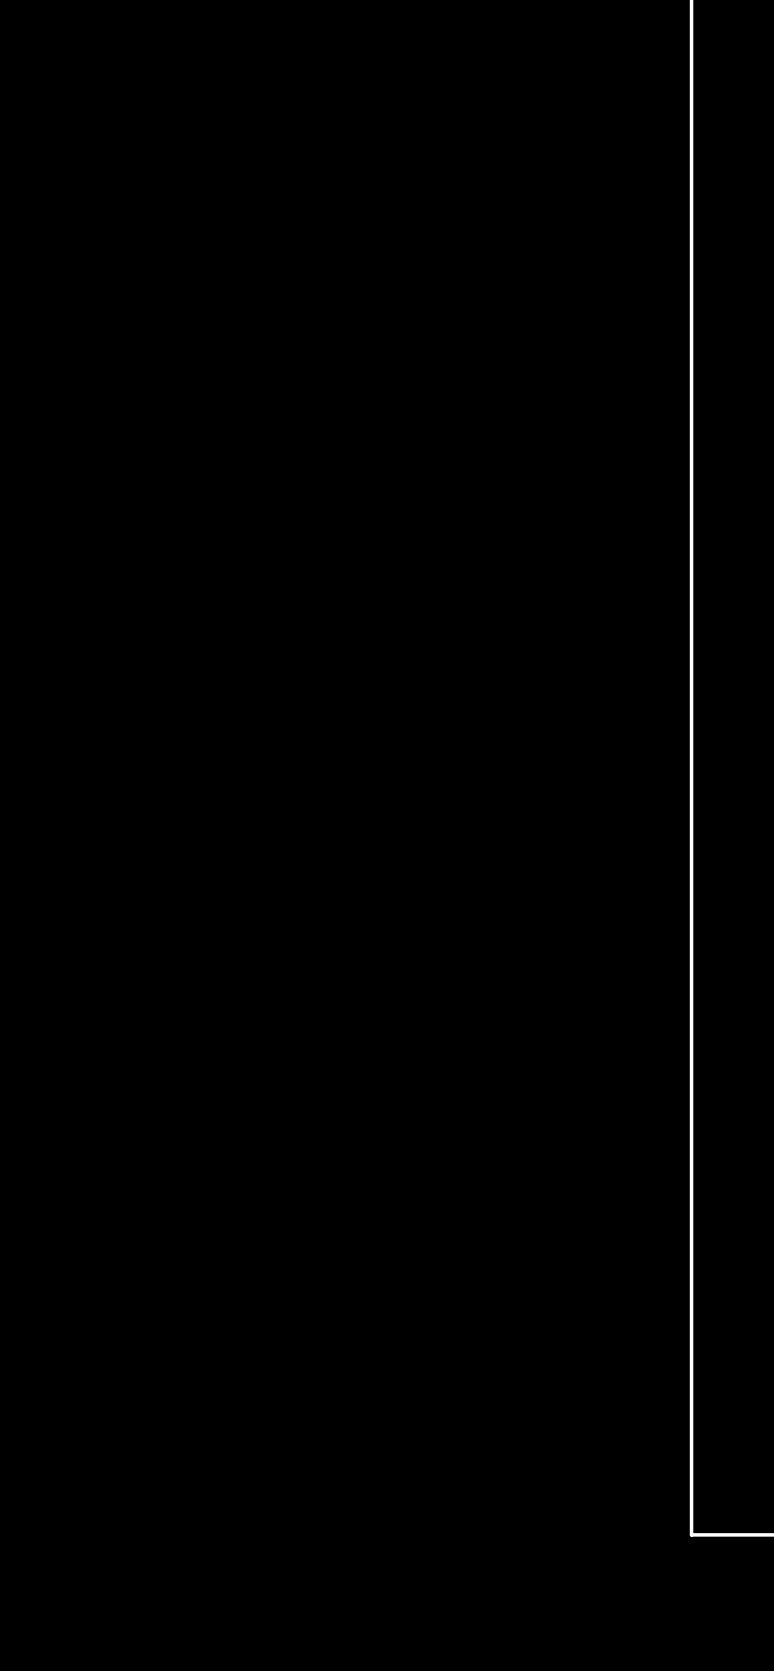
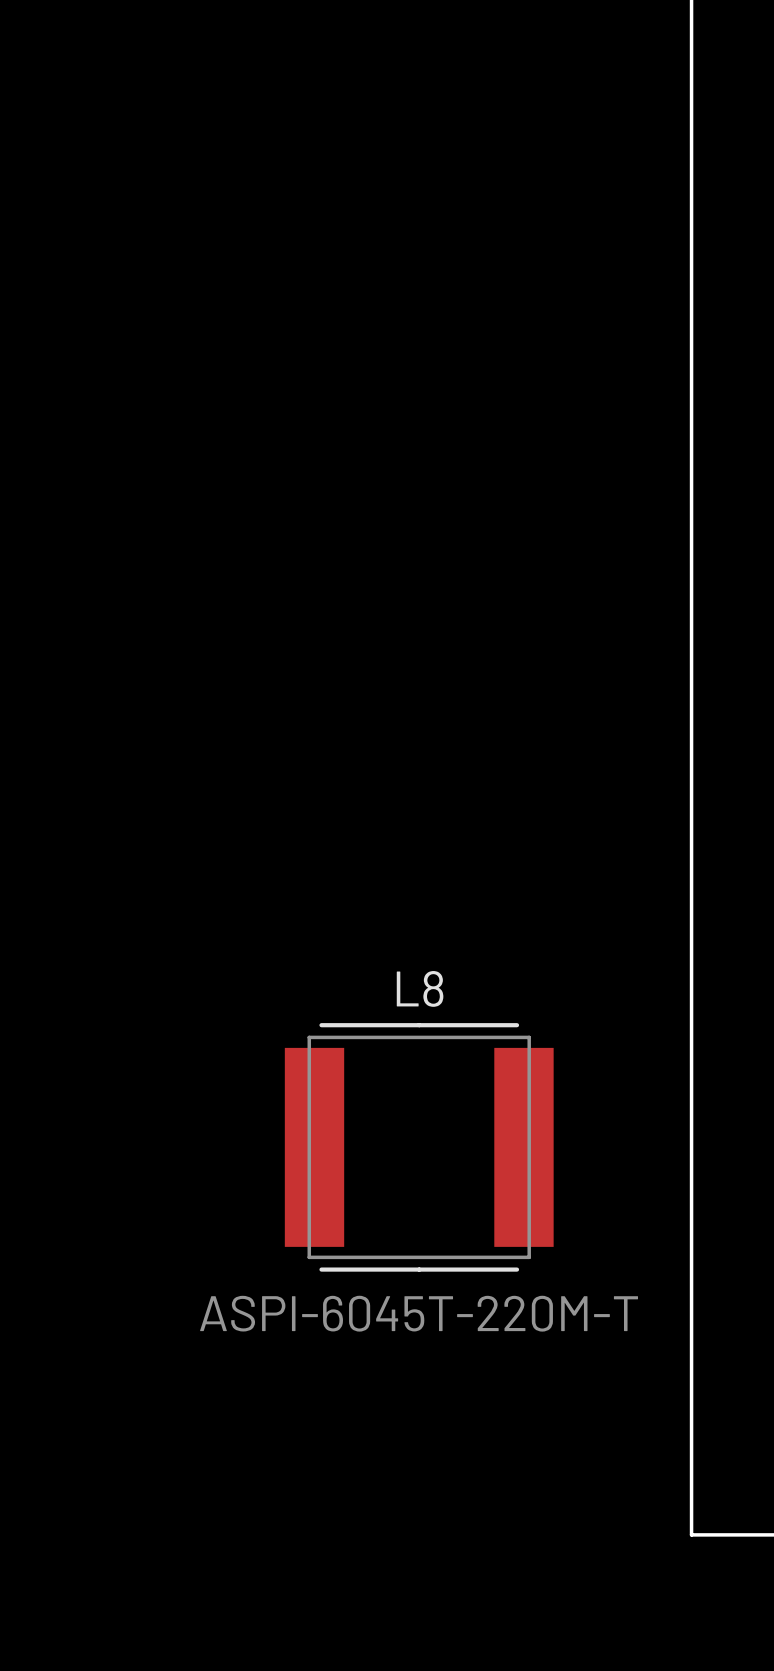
L8: none -> ASPI-6045T-220M-T (419, 1147)

